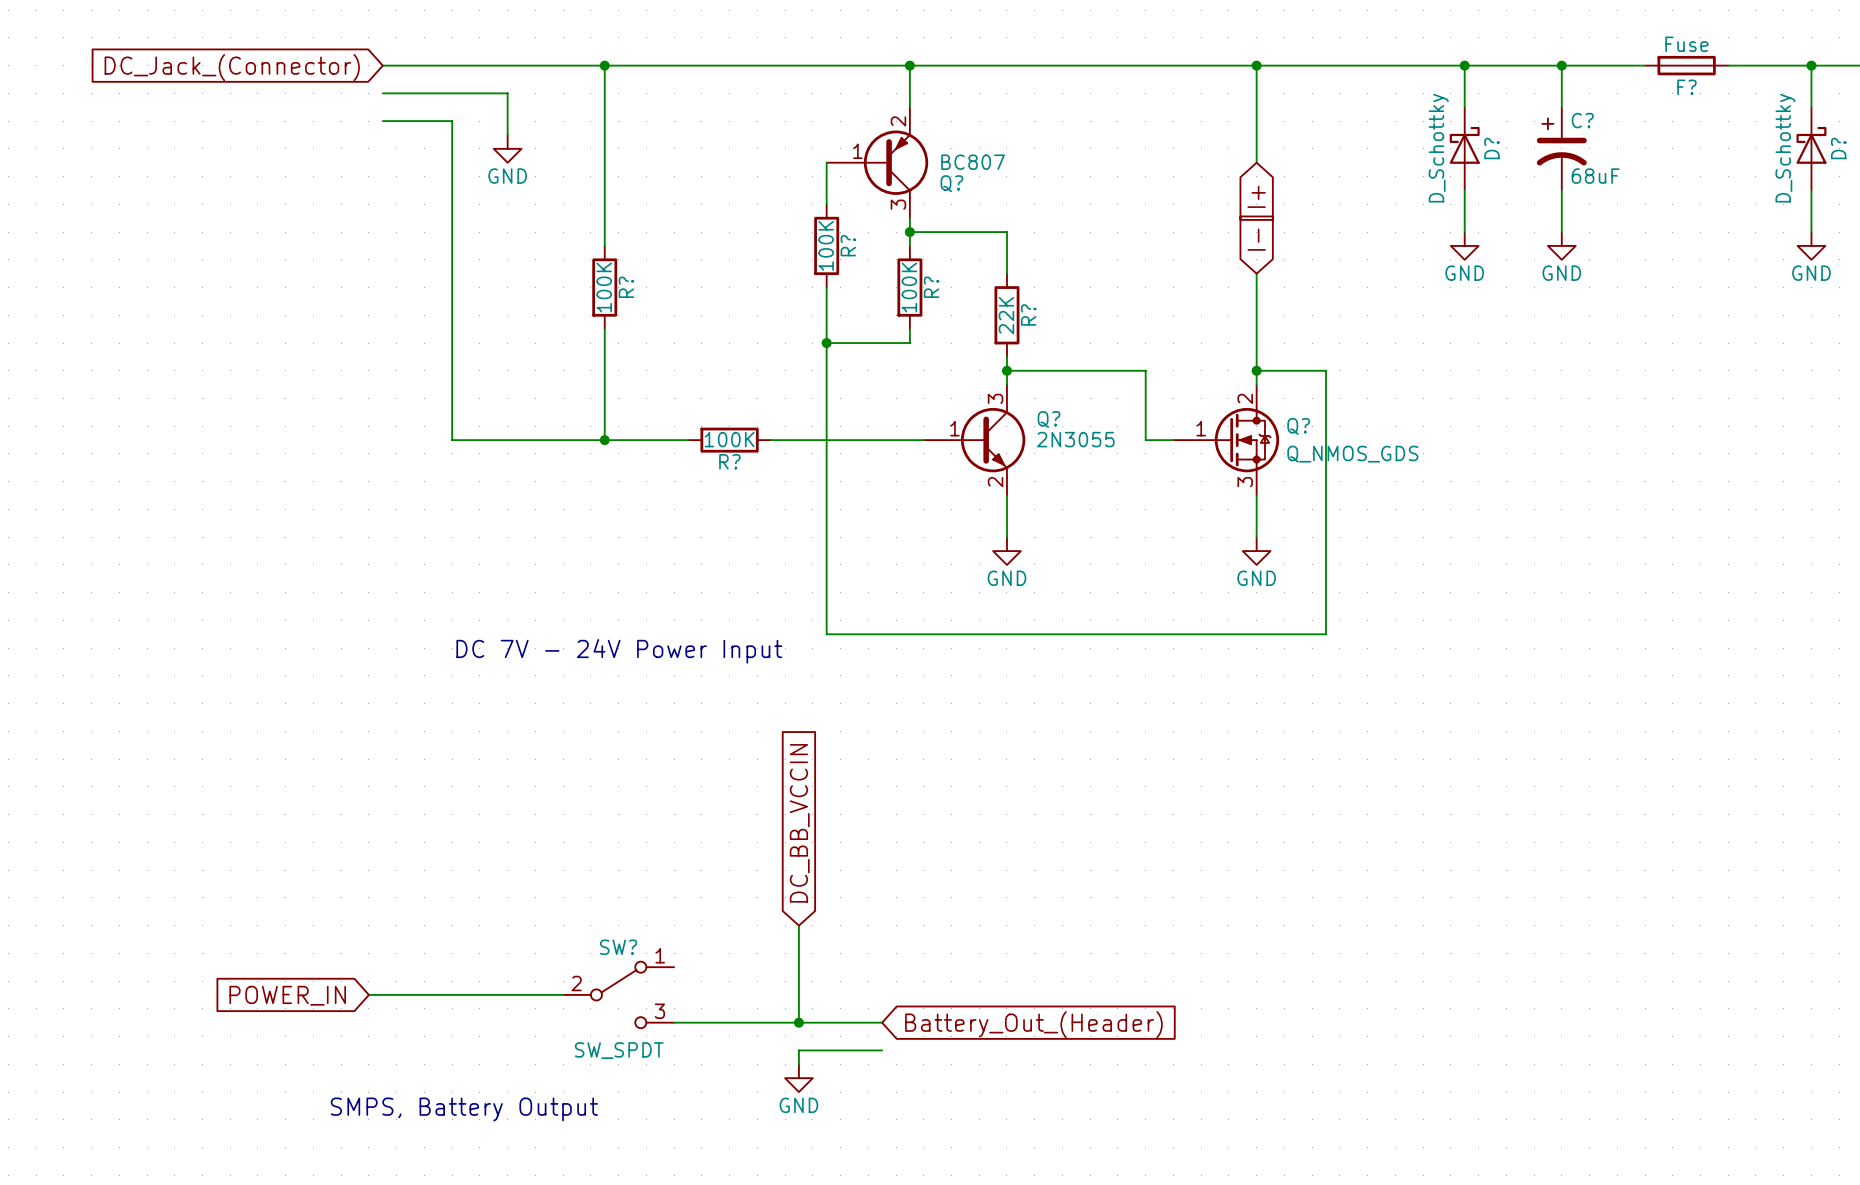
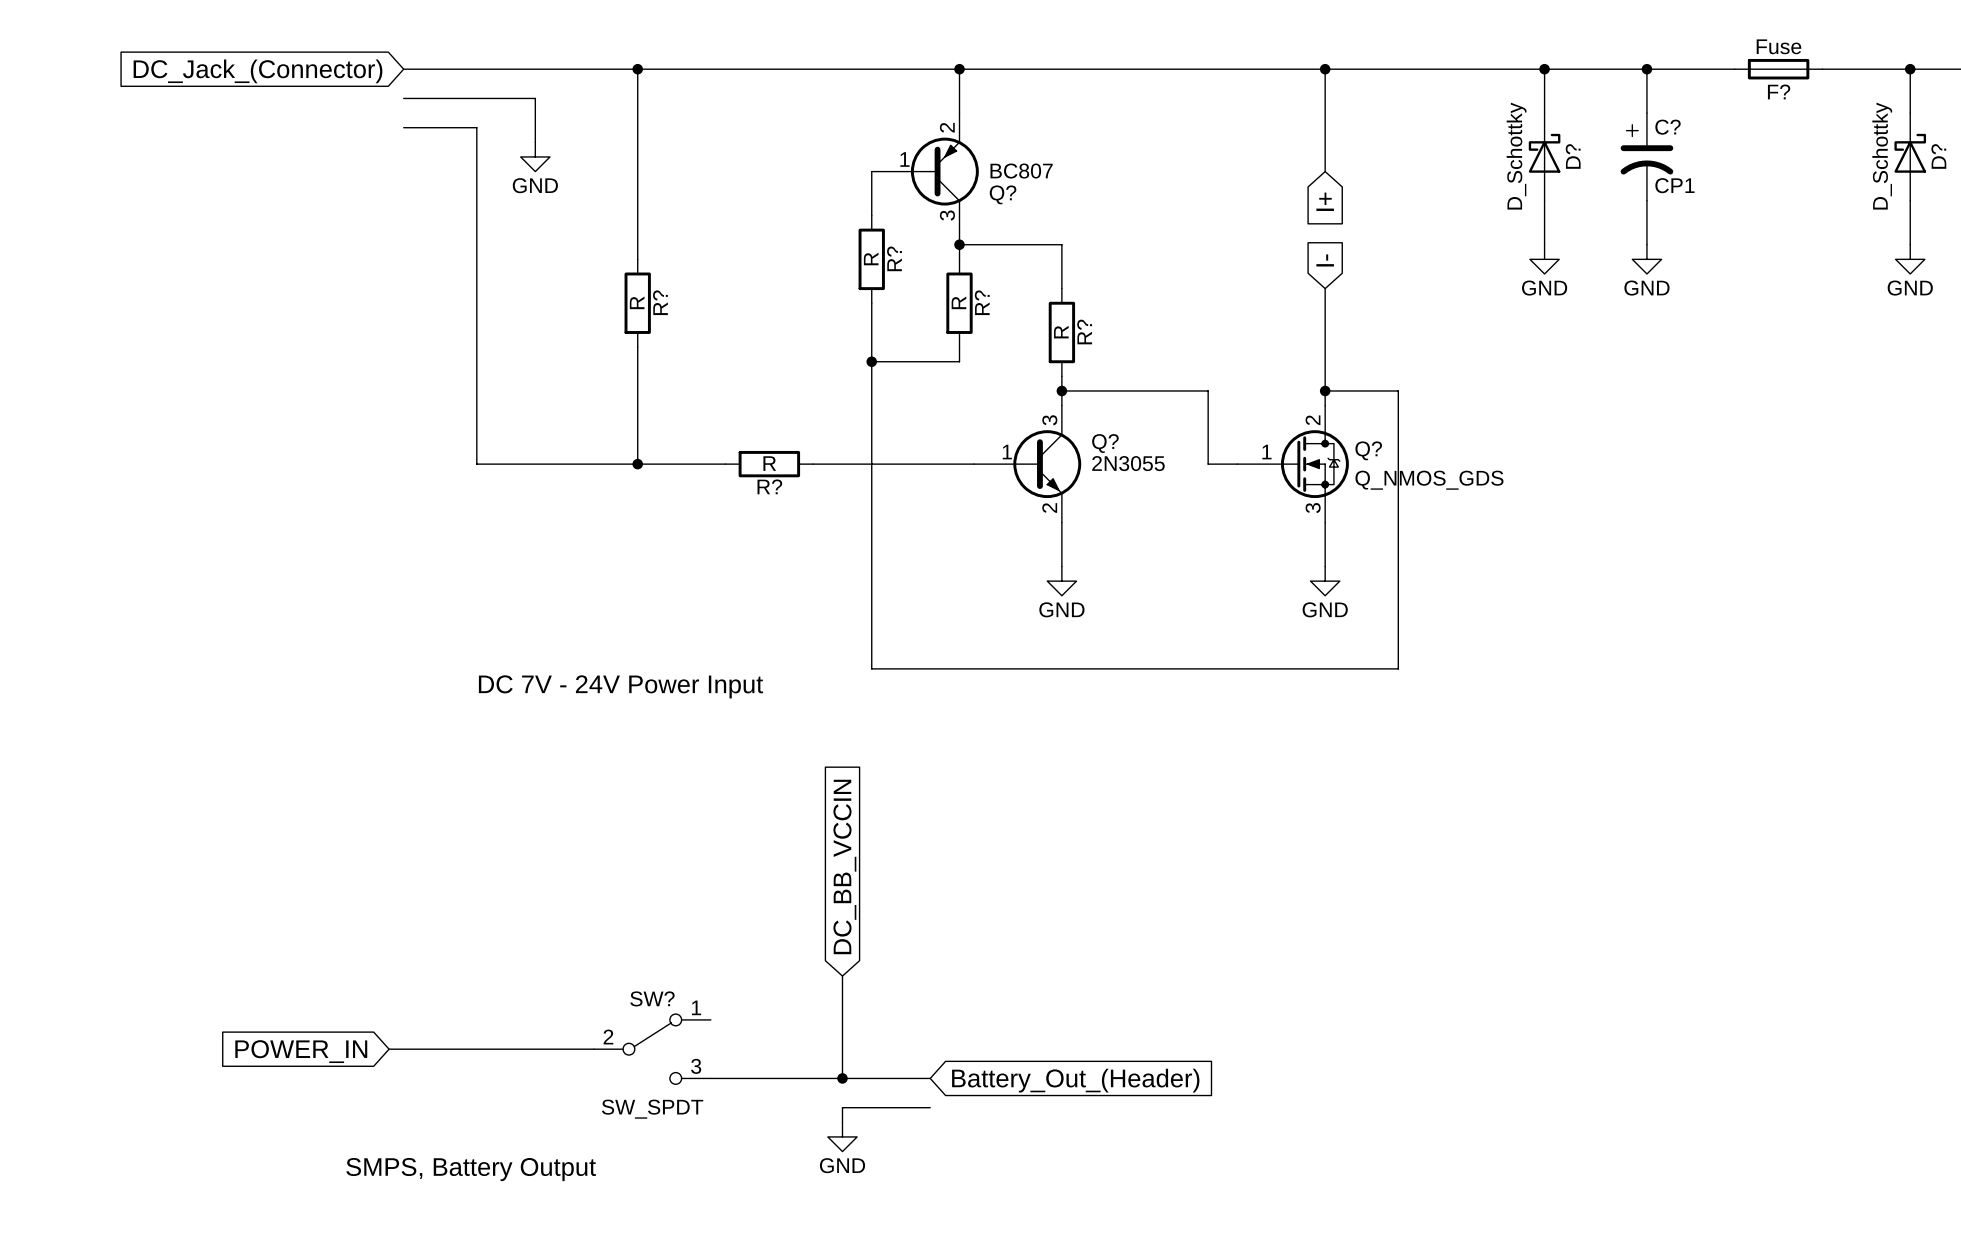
C? value: 68uF (1595, 176) -> CP1 (1674, 185)
R? value: 100K (826, 245) -> R (871, 258)
R? value: 100K (604, 287) -> R (637, 302)
R? value: 100K (909, 287) -> R (958, 302)
R? value: 22K (1006, 315) -> R (1061, 332)
R? value: 100K (729, 439) -> R (769, 463)

